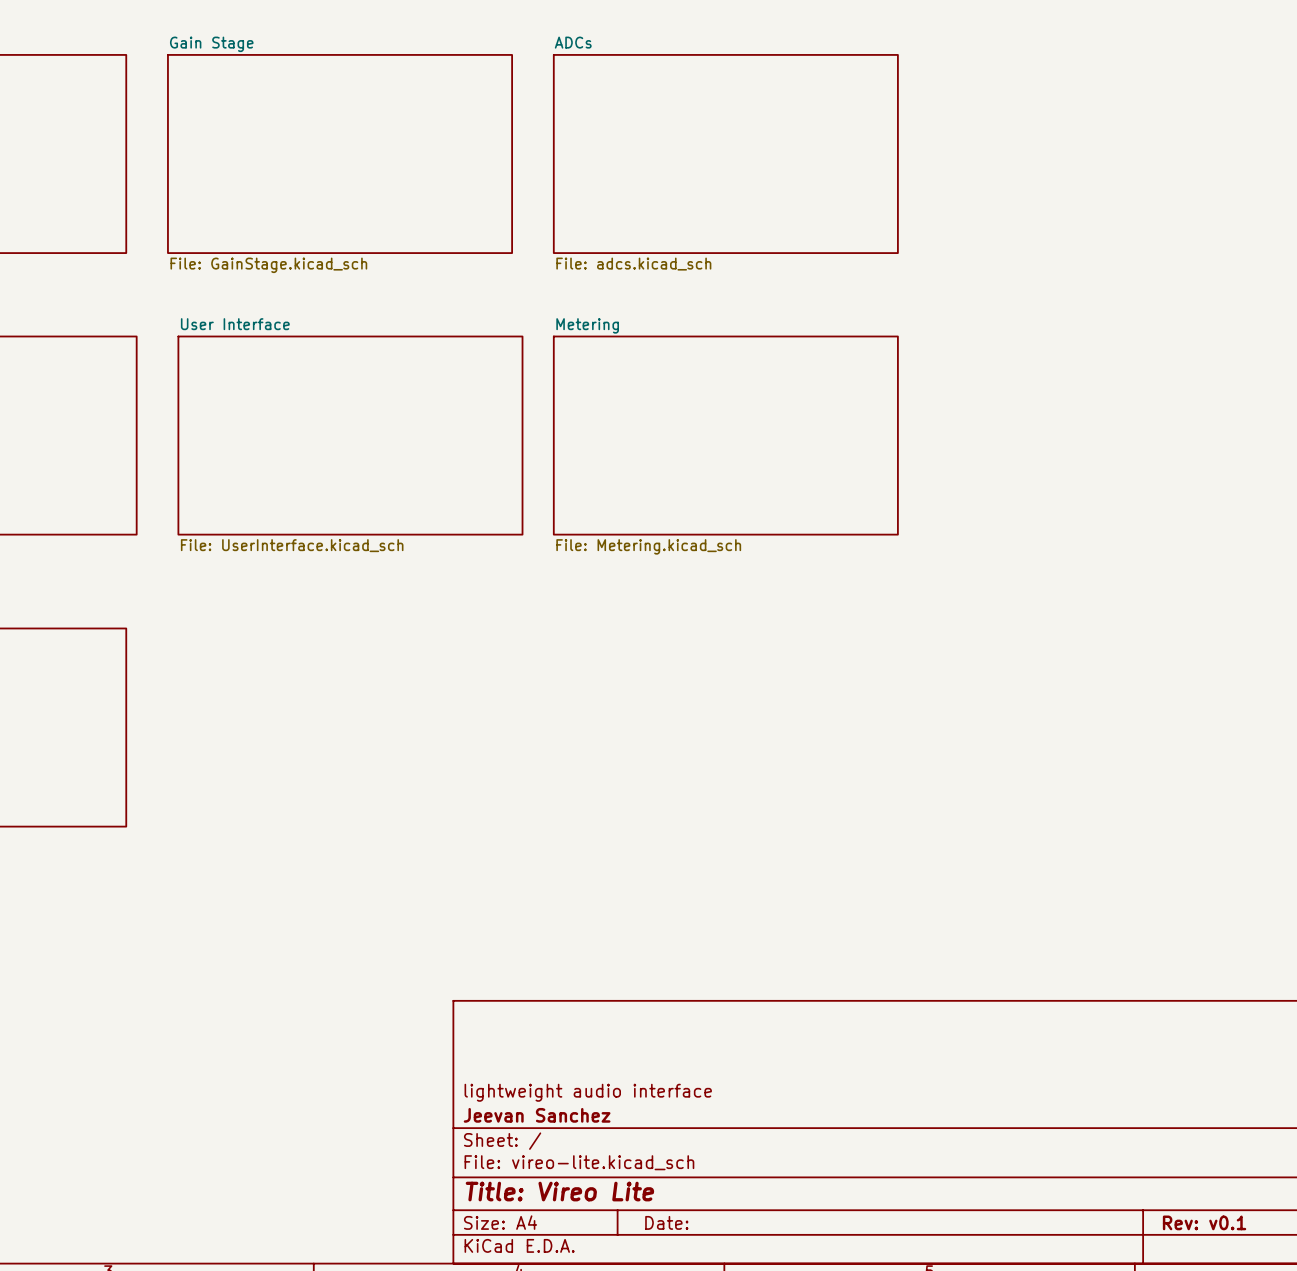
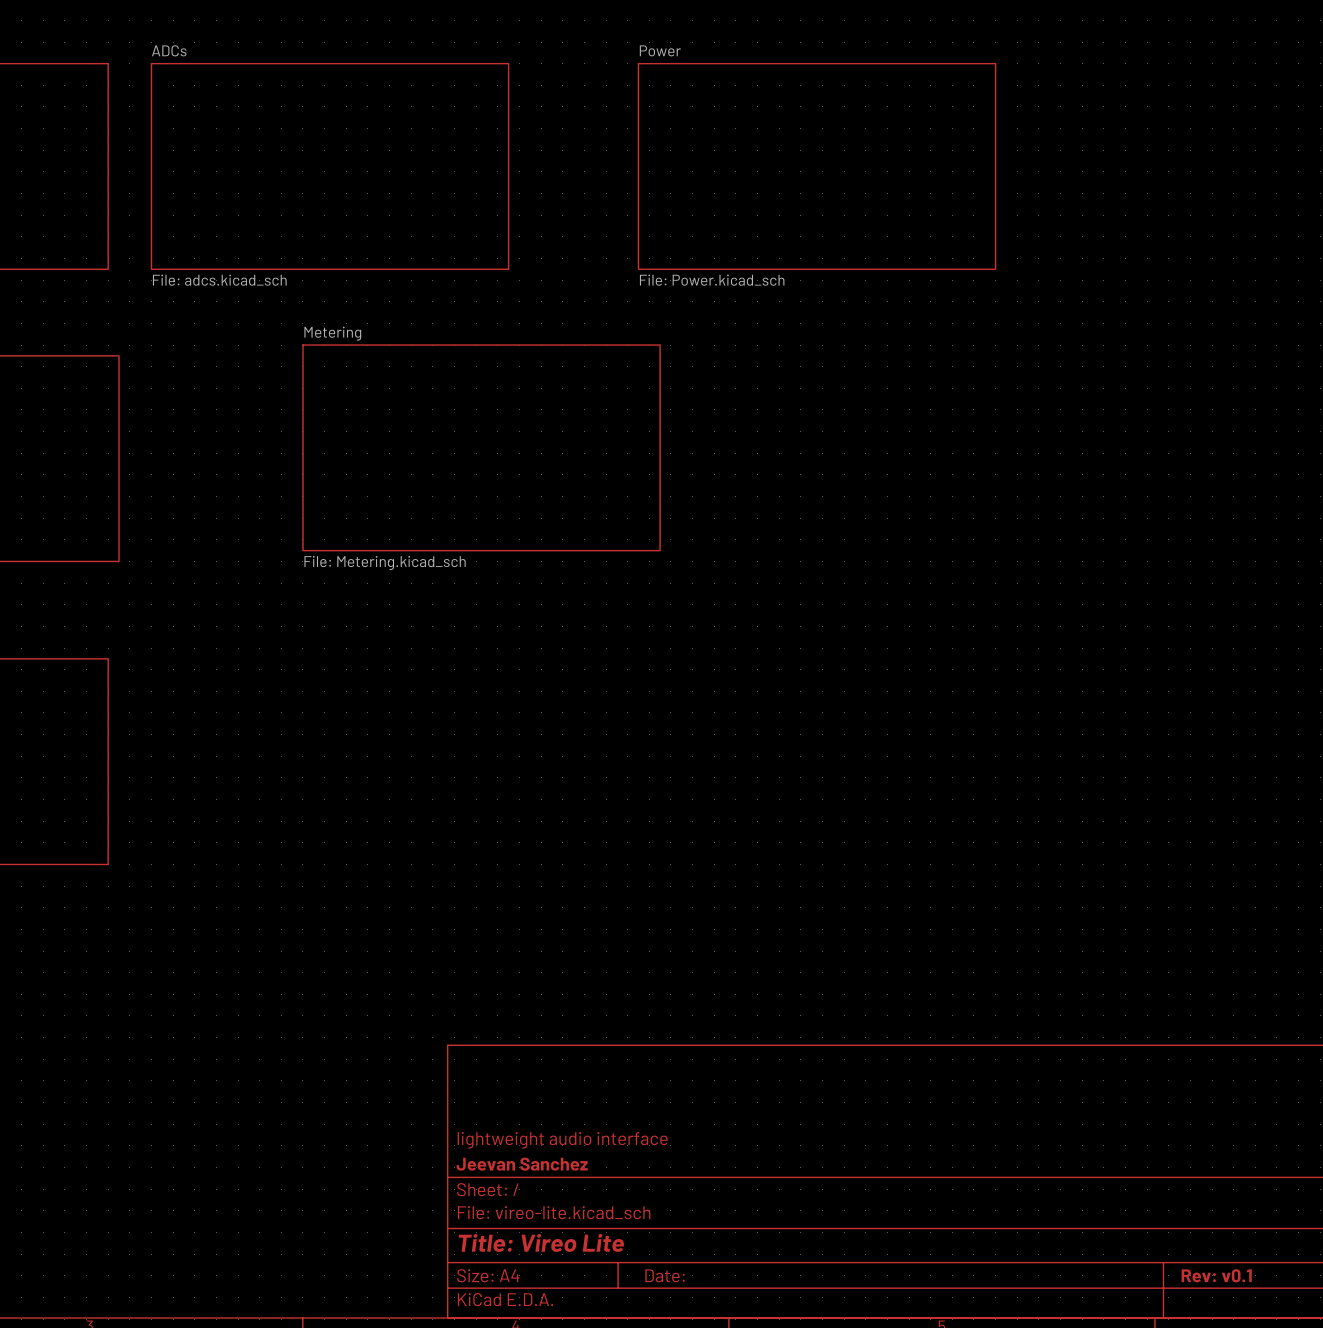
sheet Gain Stage name: Gain Stage (211, 44) -> ADCs (169, 50)
sheet ADCs: File: adcs.kicad_sch (725, 154) -> none
sheet Power: none -> File: Power.kicad_sch (817, 166)
sheet Gain Stage value: File: GainStage.kicad_sch (268, 265) -> File: adcs.kicad_sch (219, 280)
sheet Metering: none -> File: Metering.kicad_sch (481, 447)
sheet User Interface: File: UserInterface.kicad_sch (350, 435) -> none
sheet Metering: File: Metering.kicad_sch (725, 435) -> none

